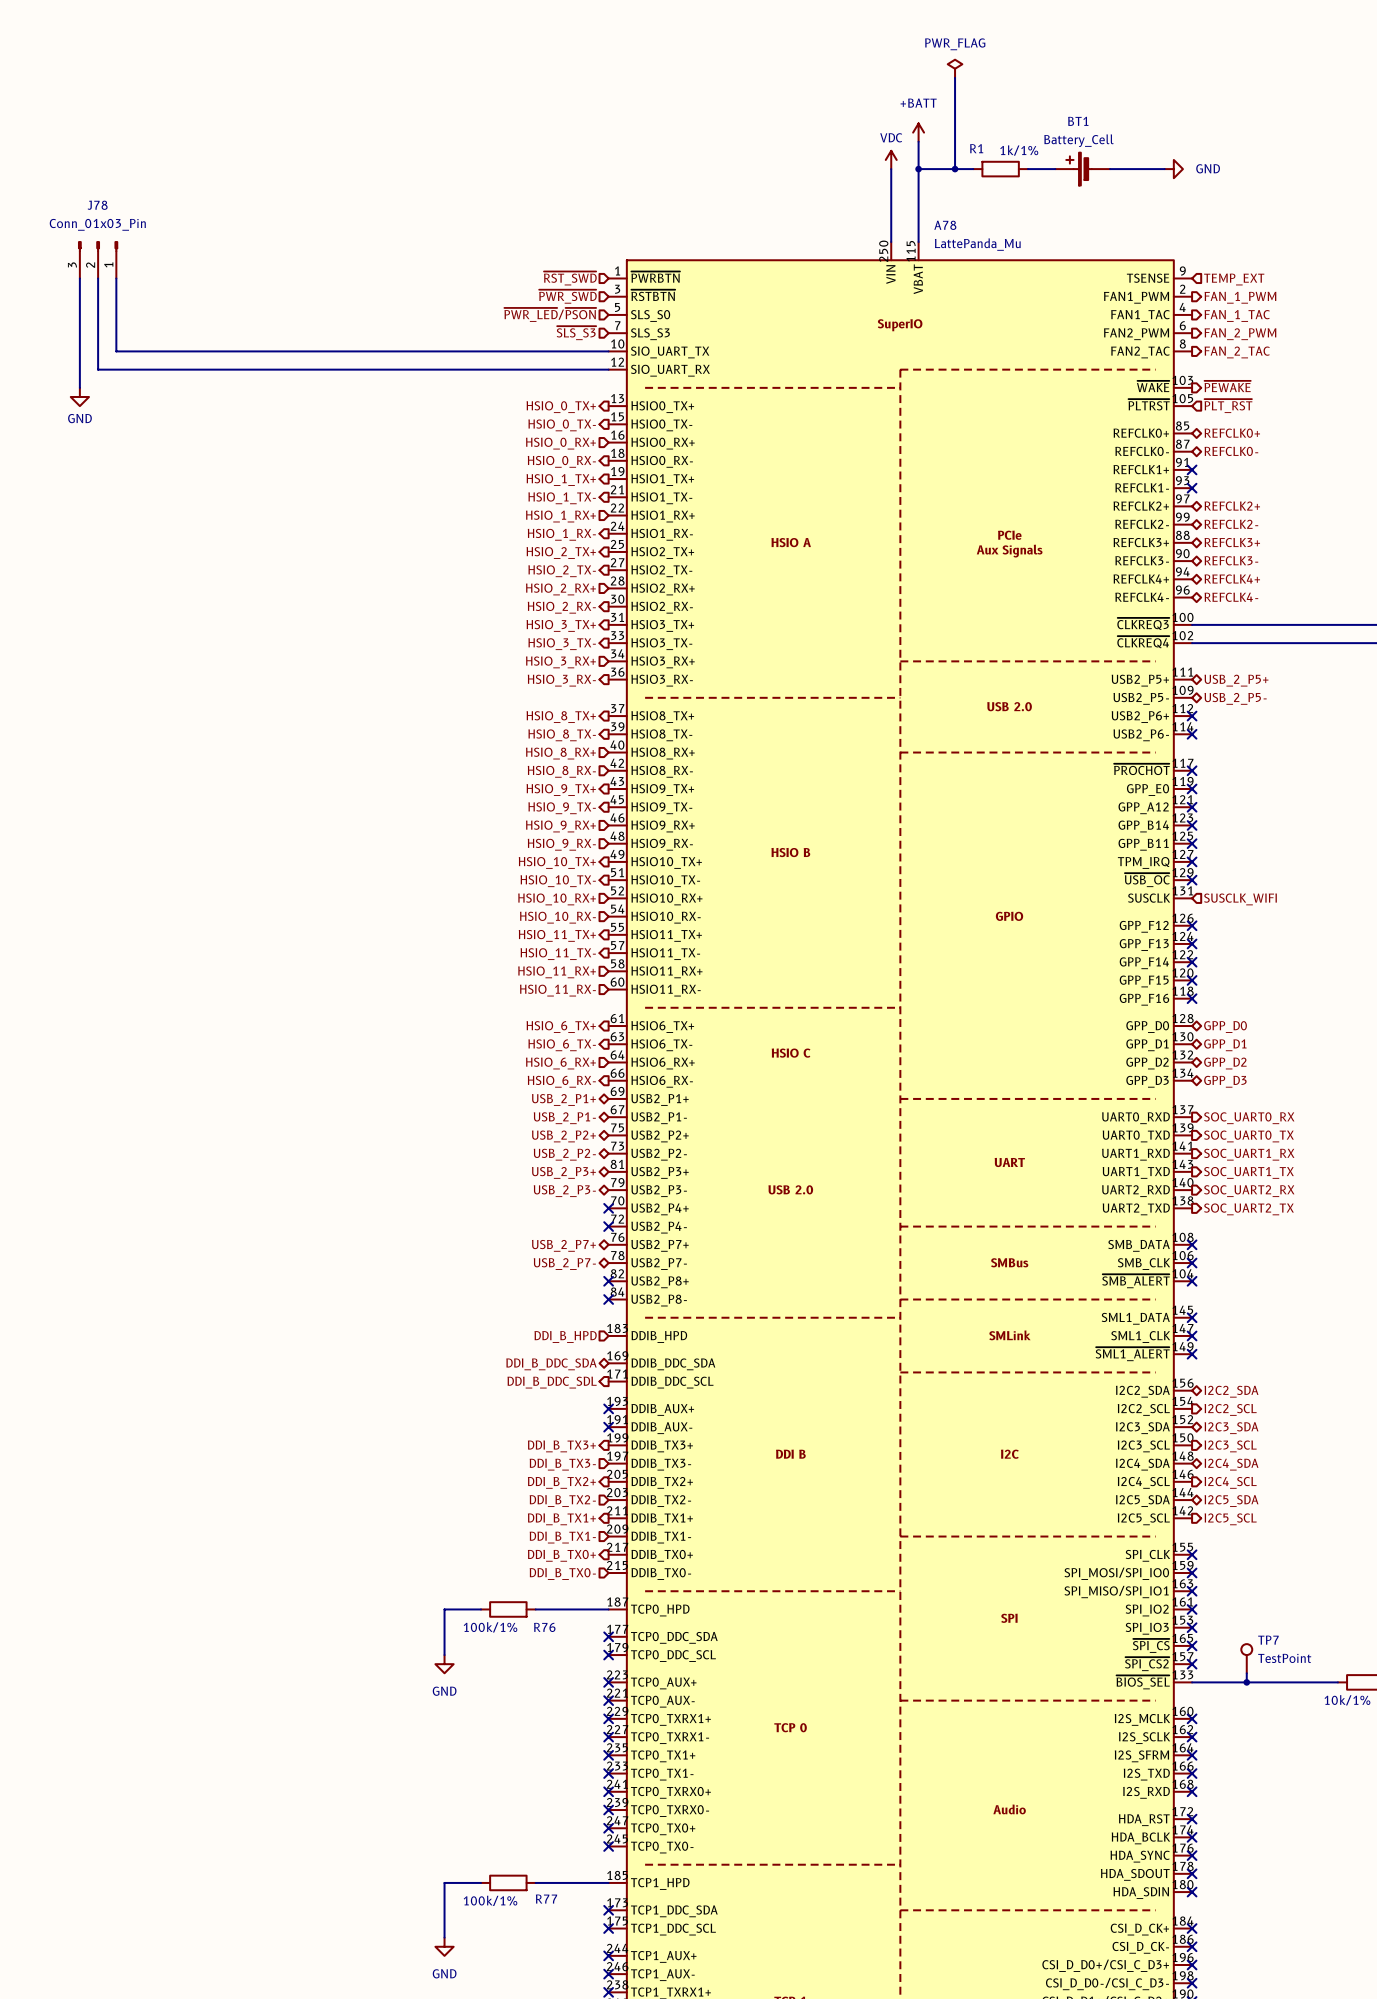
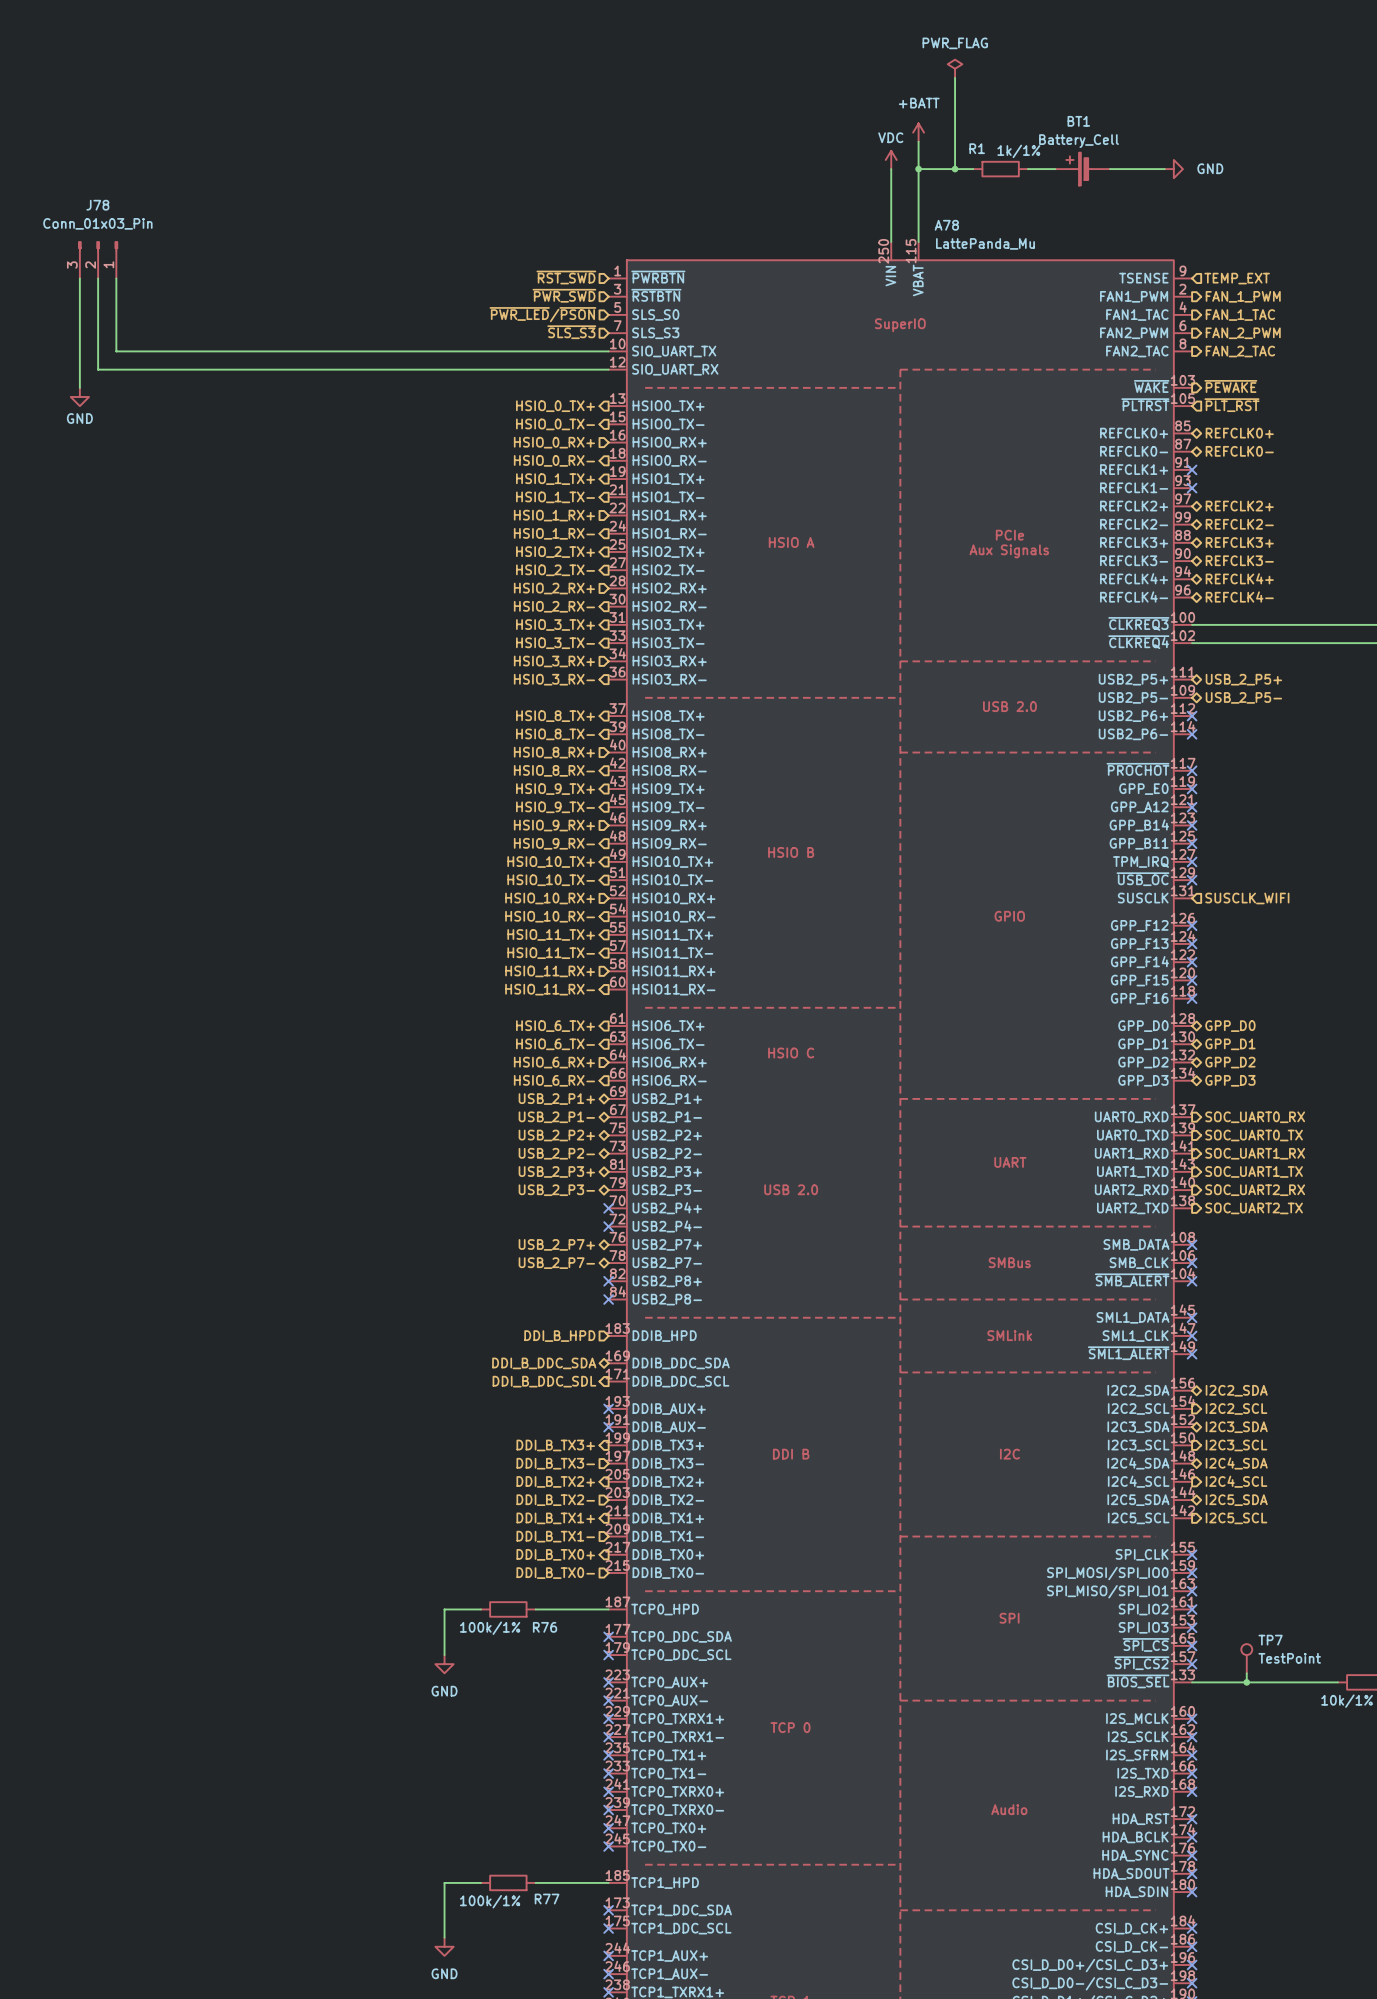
hierarchical label shape: input (561, 771) -> output (554, 770)
hierarchical label shape: input (561, 844) -> output (554, 843)
hierarchical label shape: input (557, 917) -> output (550, 916)
hierarchical label shape: input (557, 990) -> output (550, 989)

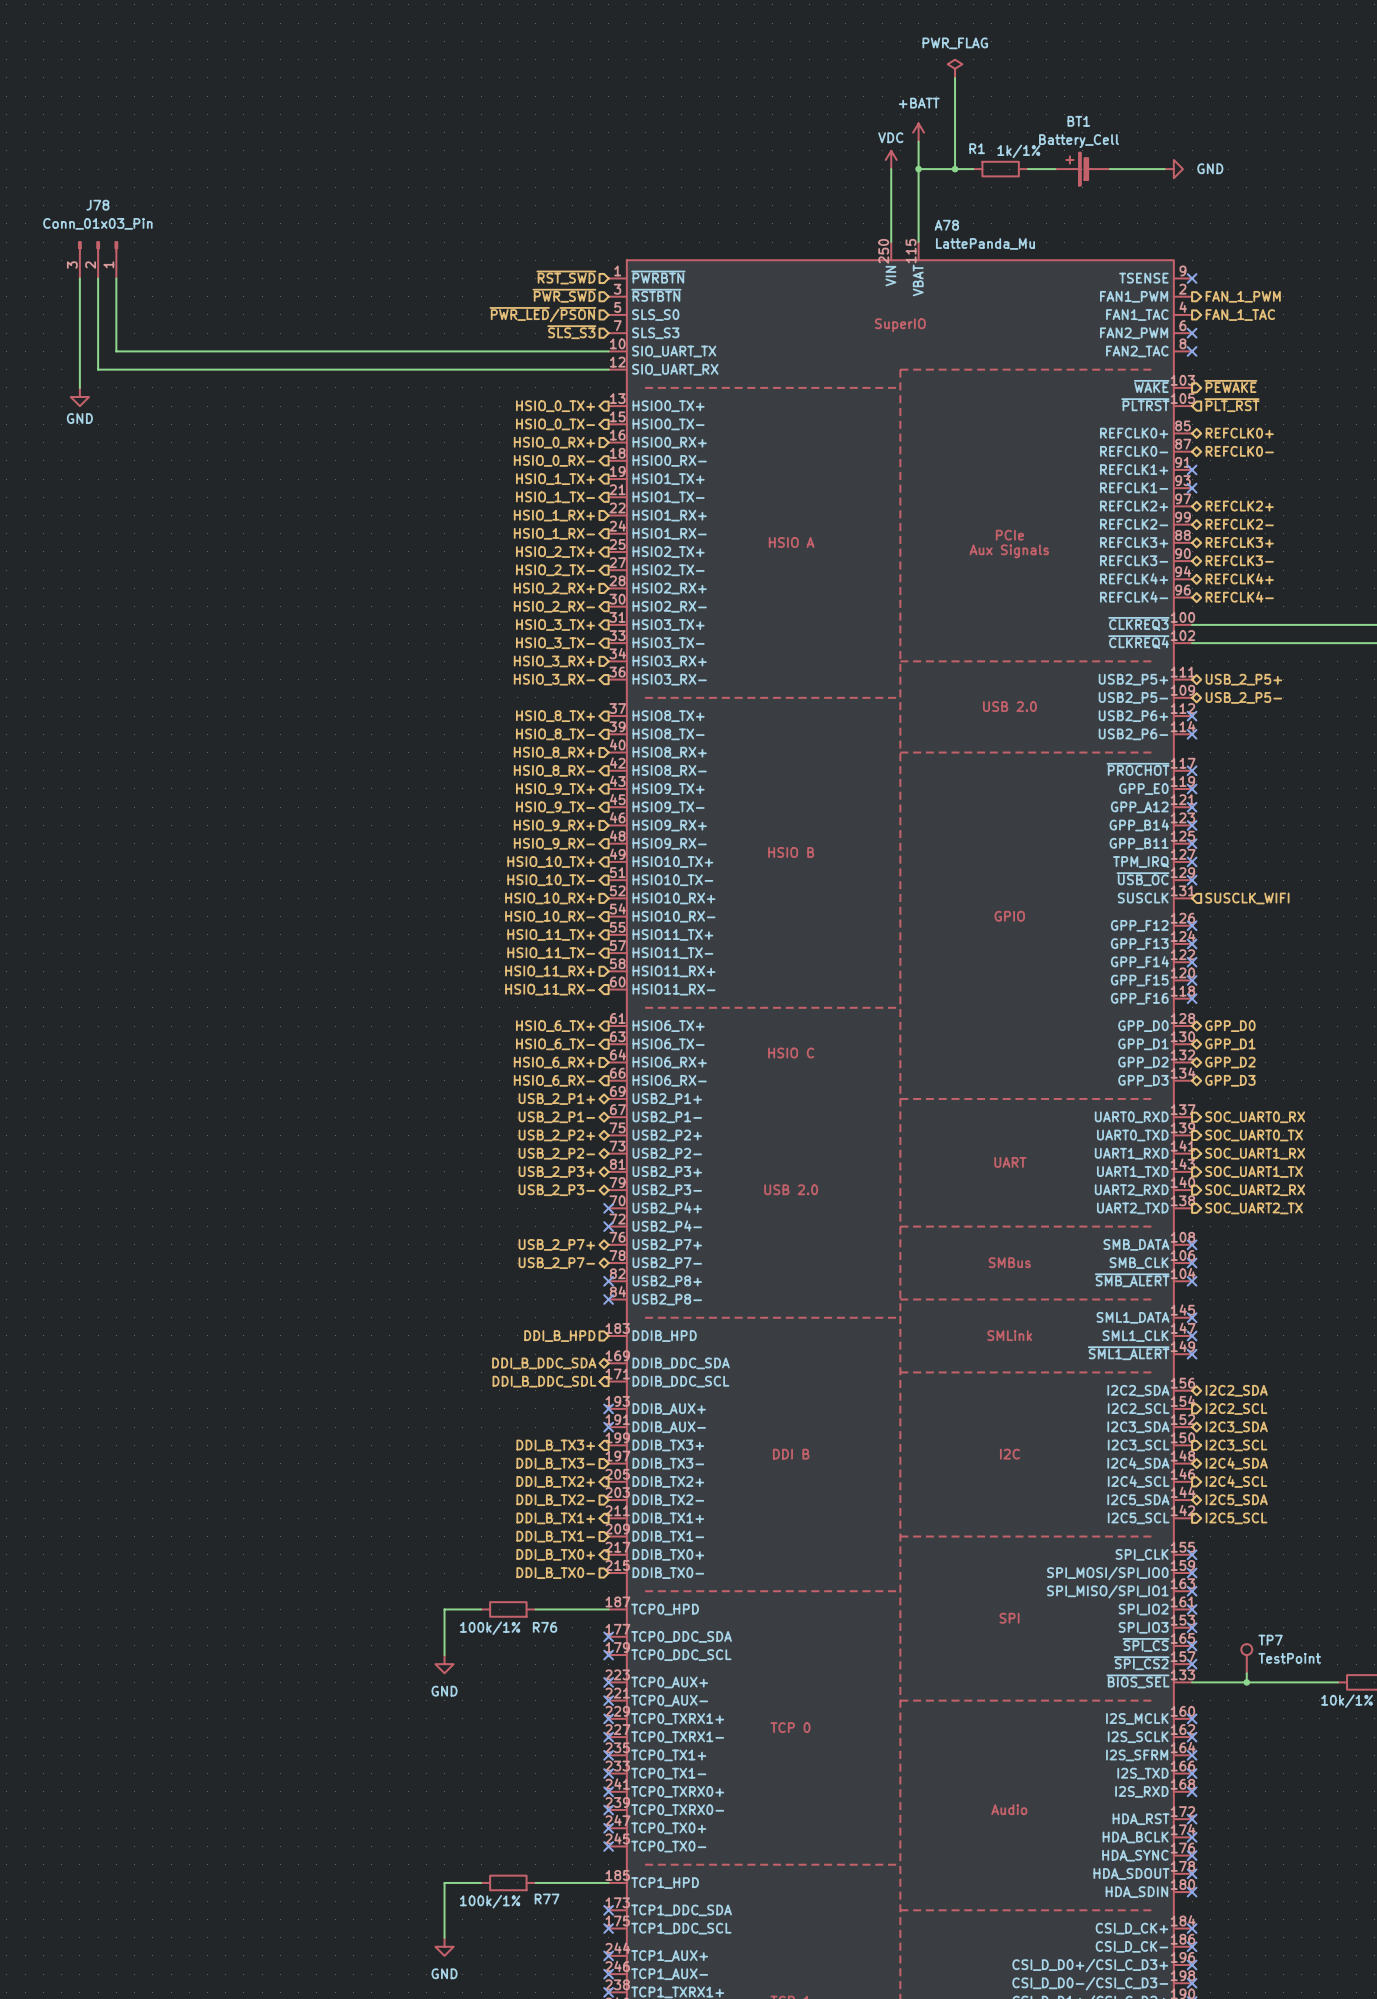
no-connect mark: none -> (1192, 278)
hierarchical label: TEMP_EXT (1237, 278) -> none
no-connect mark: none -> (1192, 333)
hierarchical label: FAN_2_PWM (1243, 333) -> none
no-connect mark: none -> (1192, 351)
hierarchical label: FAN_2_TAC (1240, 351) -> none

